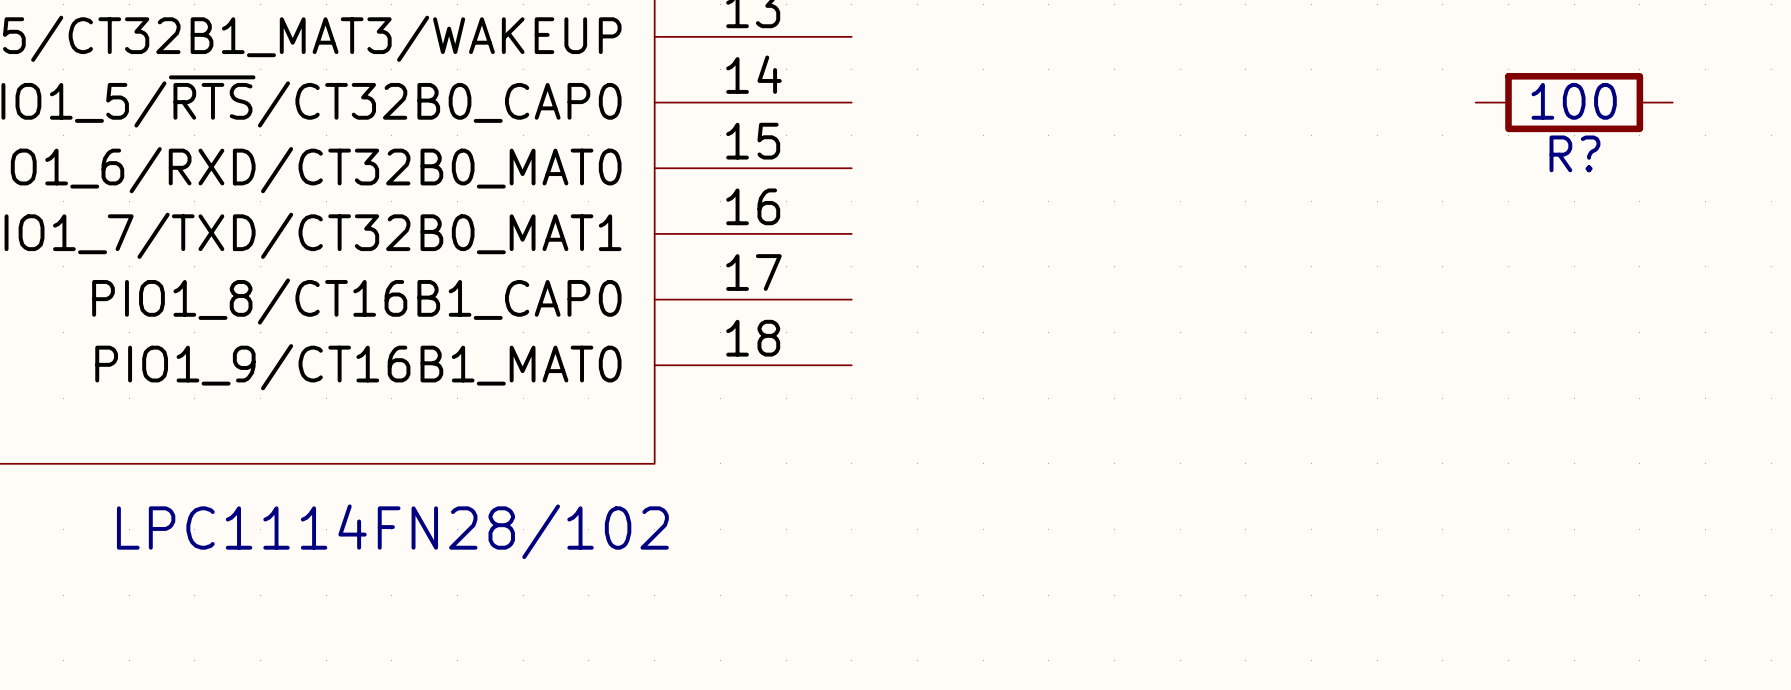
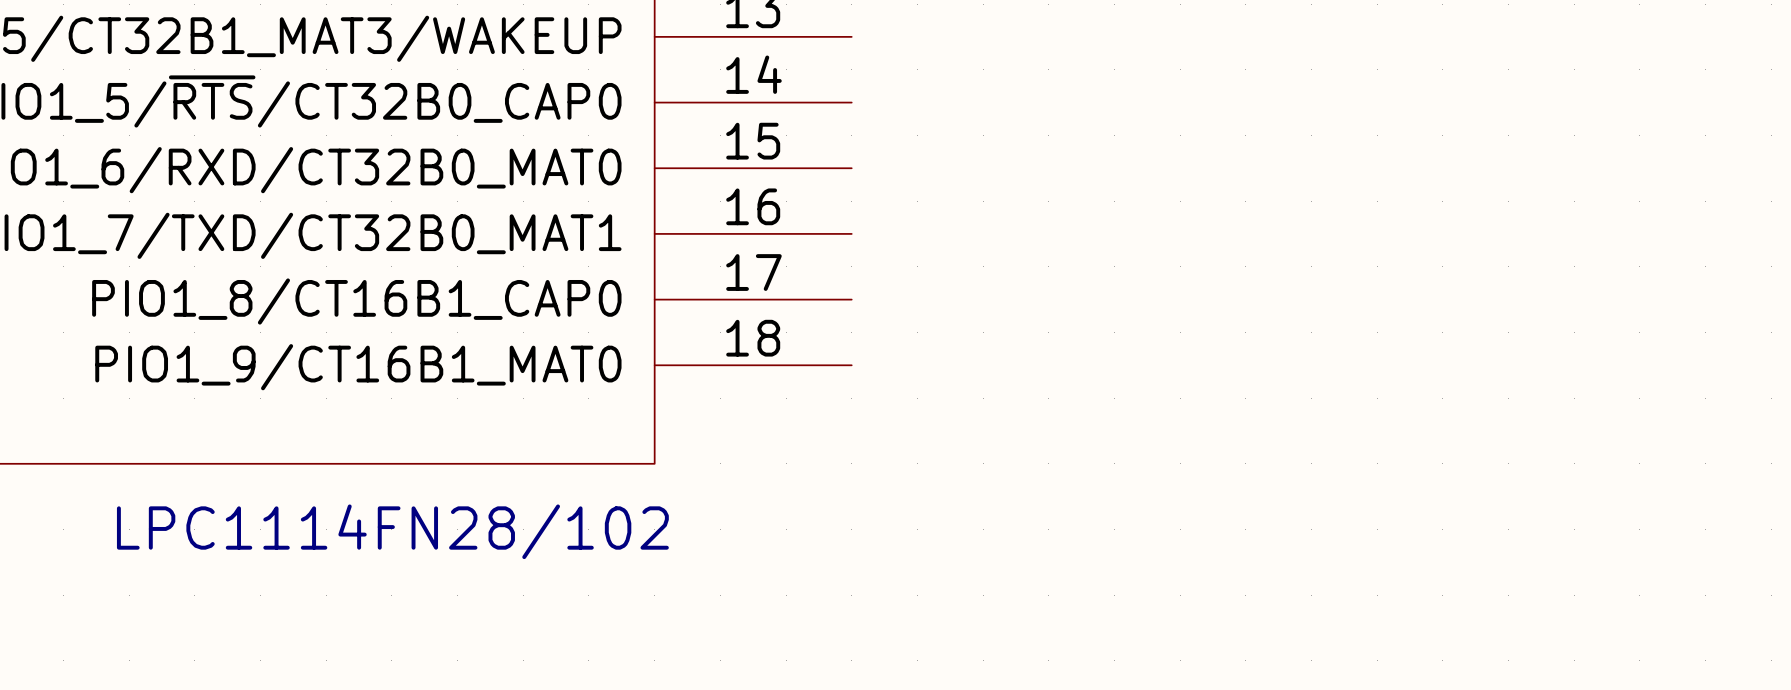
R?: 100 (1574, 102) -> none

